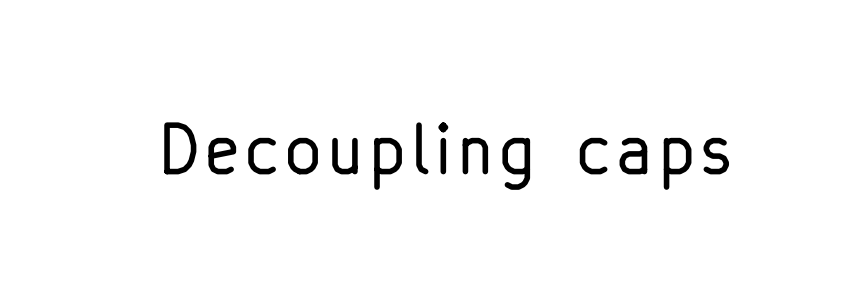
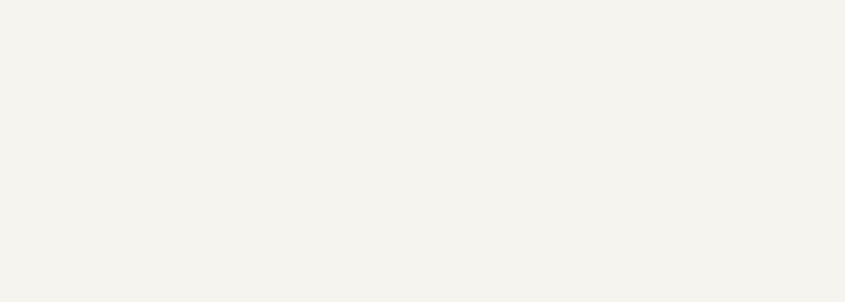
text: Decoupling caps (446, 156) -> none

